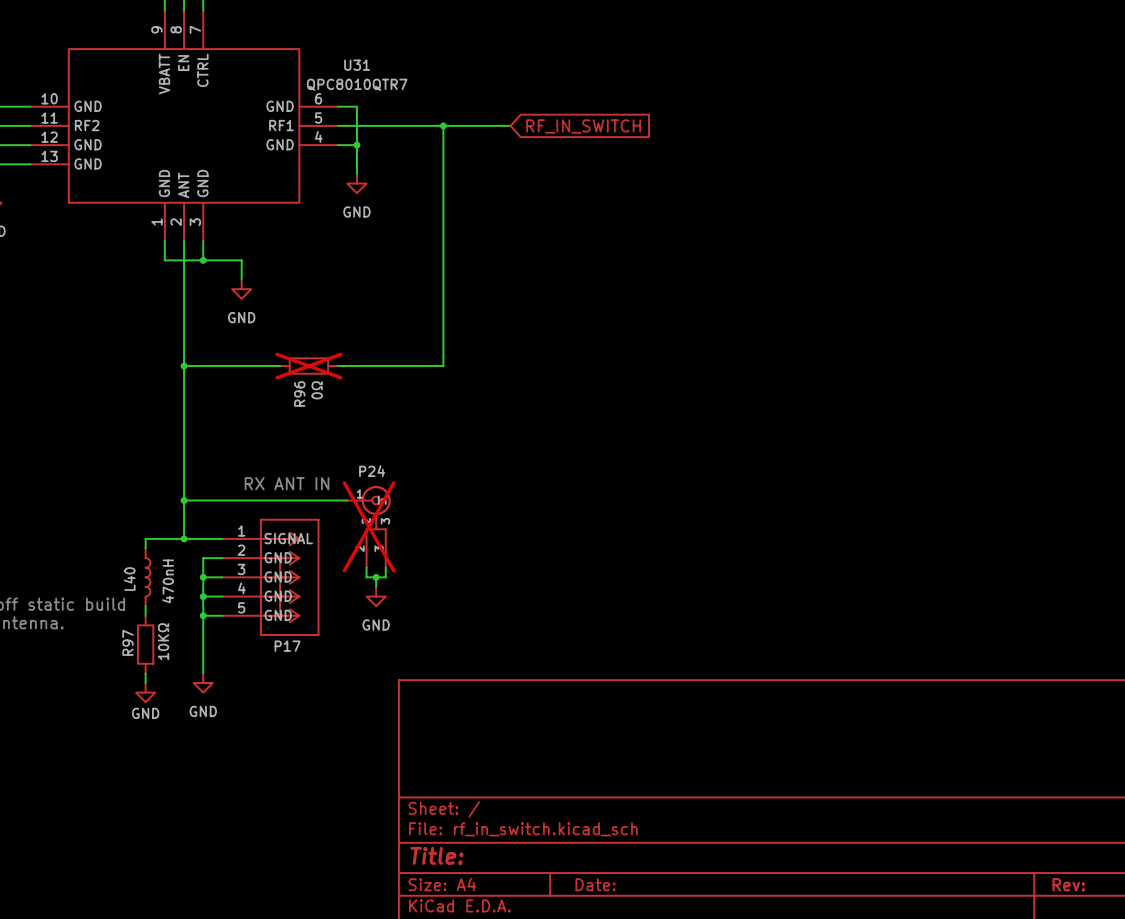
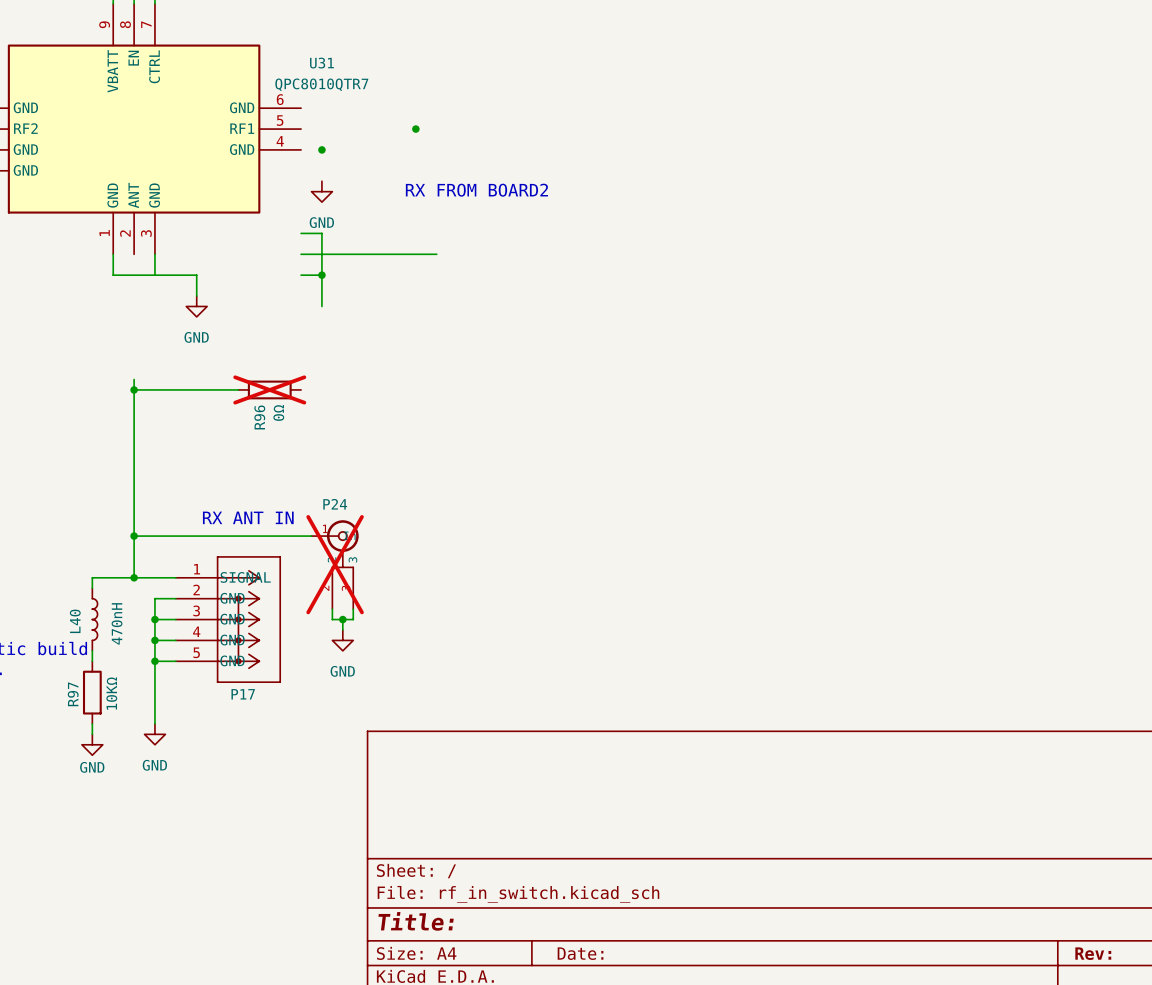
wire: (337, 106) (356, 106) (356, 173) -> (301, 233) (321, 233) (321, 306)
wire: (337, 125) (510, 125) -> none
wire: (443, 125) (443, 366) (337, 366) -> none
global label: RF_IN_SWITCH (583, 126) -> none
wire: (337, 145) (356, 145) -> (301, 275) (321, 275)
text: none -> RX FROM BOARD2 (476, 190)
wire: (184, 241) (184, 356) -> none
wire: none -> (301, 254) (436, 254)
junction: (203, 260) -> none
junction: none -> (321, 275)

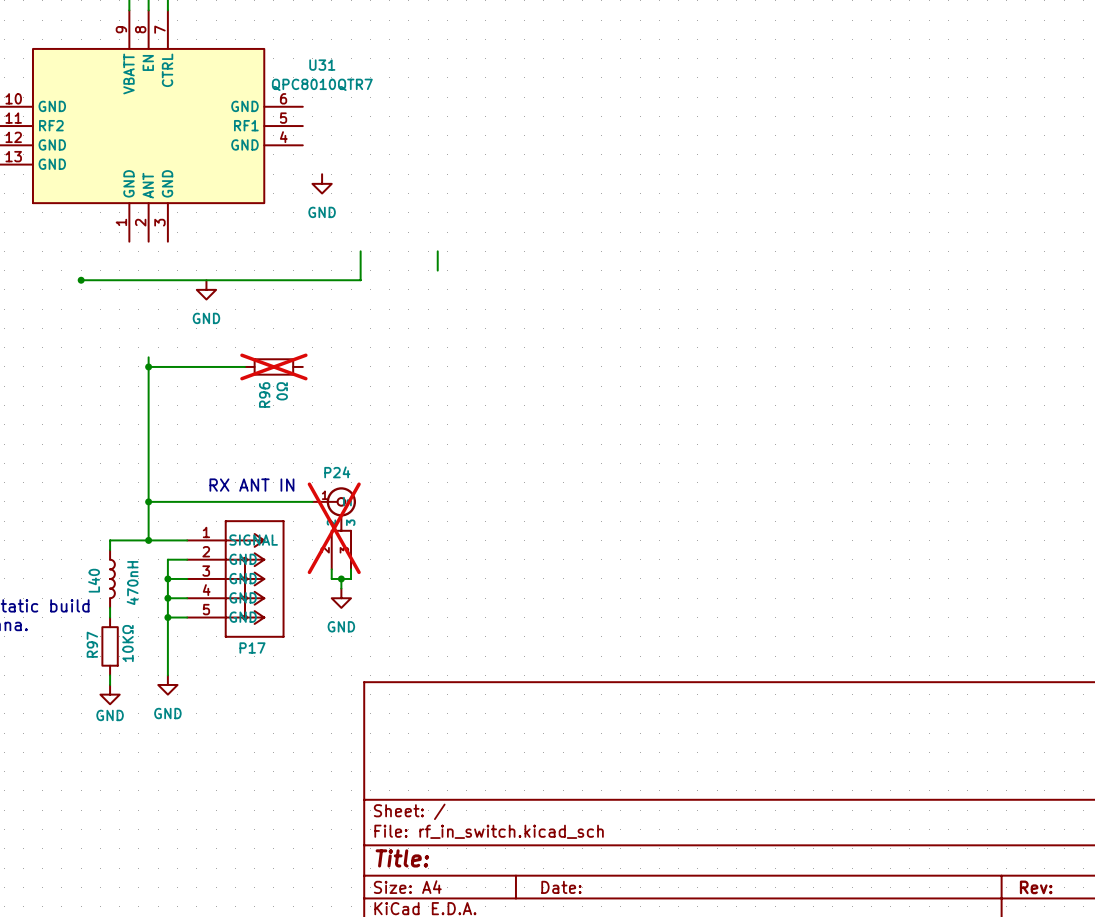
junction: (415, 129) -> none
junction: (321, 149) -> none
text: RX FROM BOARD2 (476, 190) -> none
wire: (301, 233) (321, 233) (321, 306) -> none
wire: (113, 254) (113, 275) (196, 275) (196, 296) -> none
wire: (154, 254) (154, 275) -> none
wire: (301, 254) (436, 254) -> none
wire: none -> (360, 251) (360, 280) (81, 280)
wire: none -> (437, 251) (437, 270)
wire: (301, 275) (321, 275) -> none
junction: (321, 275) -> none
junction: none -> (81, 280)

